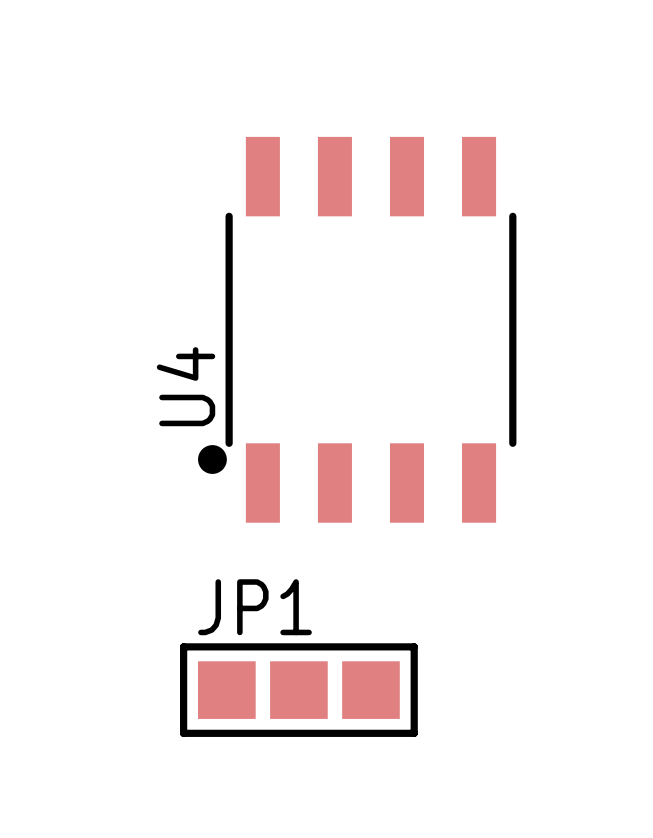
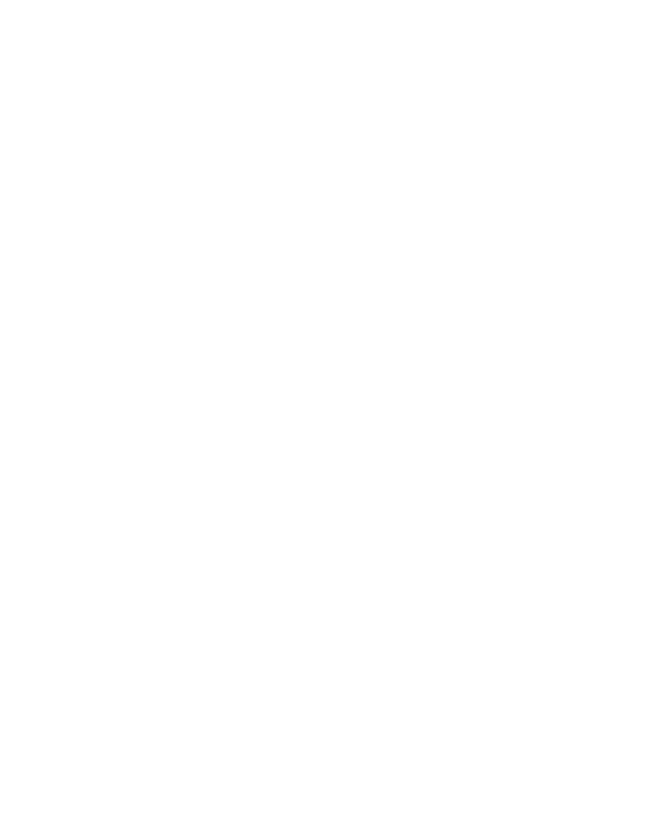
U4: (357, 329) -> none
JP1: (298, 690) -> none

